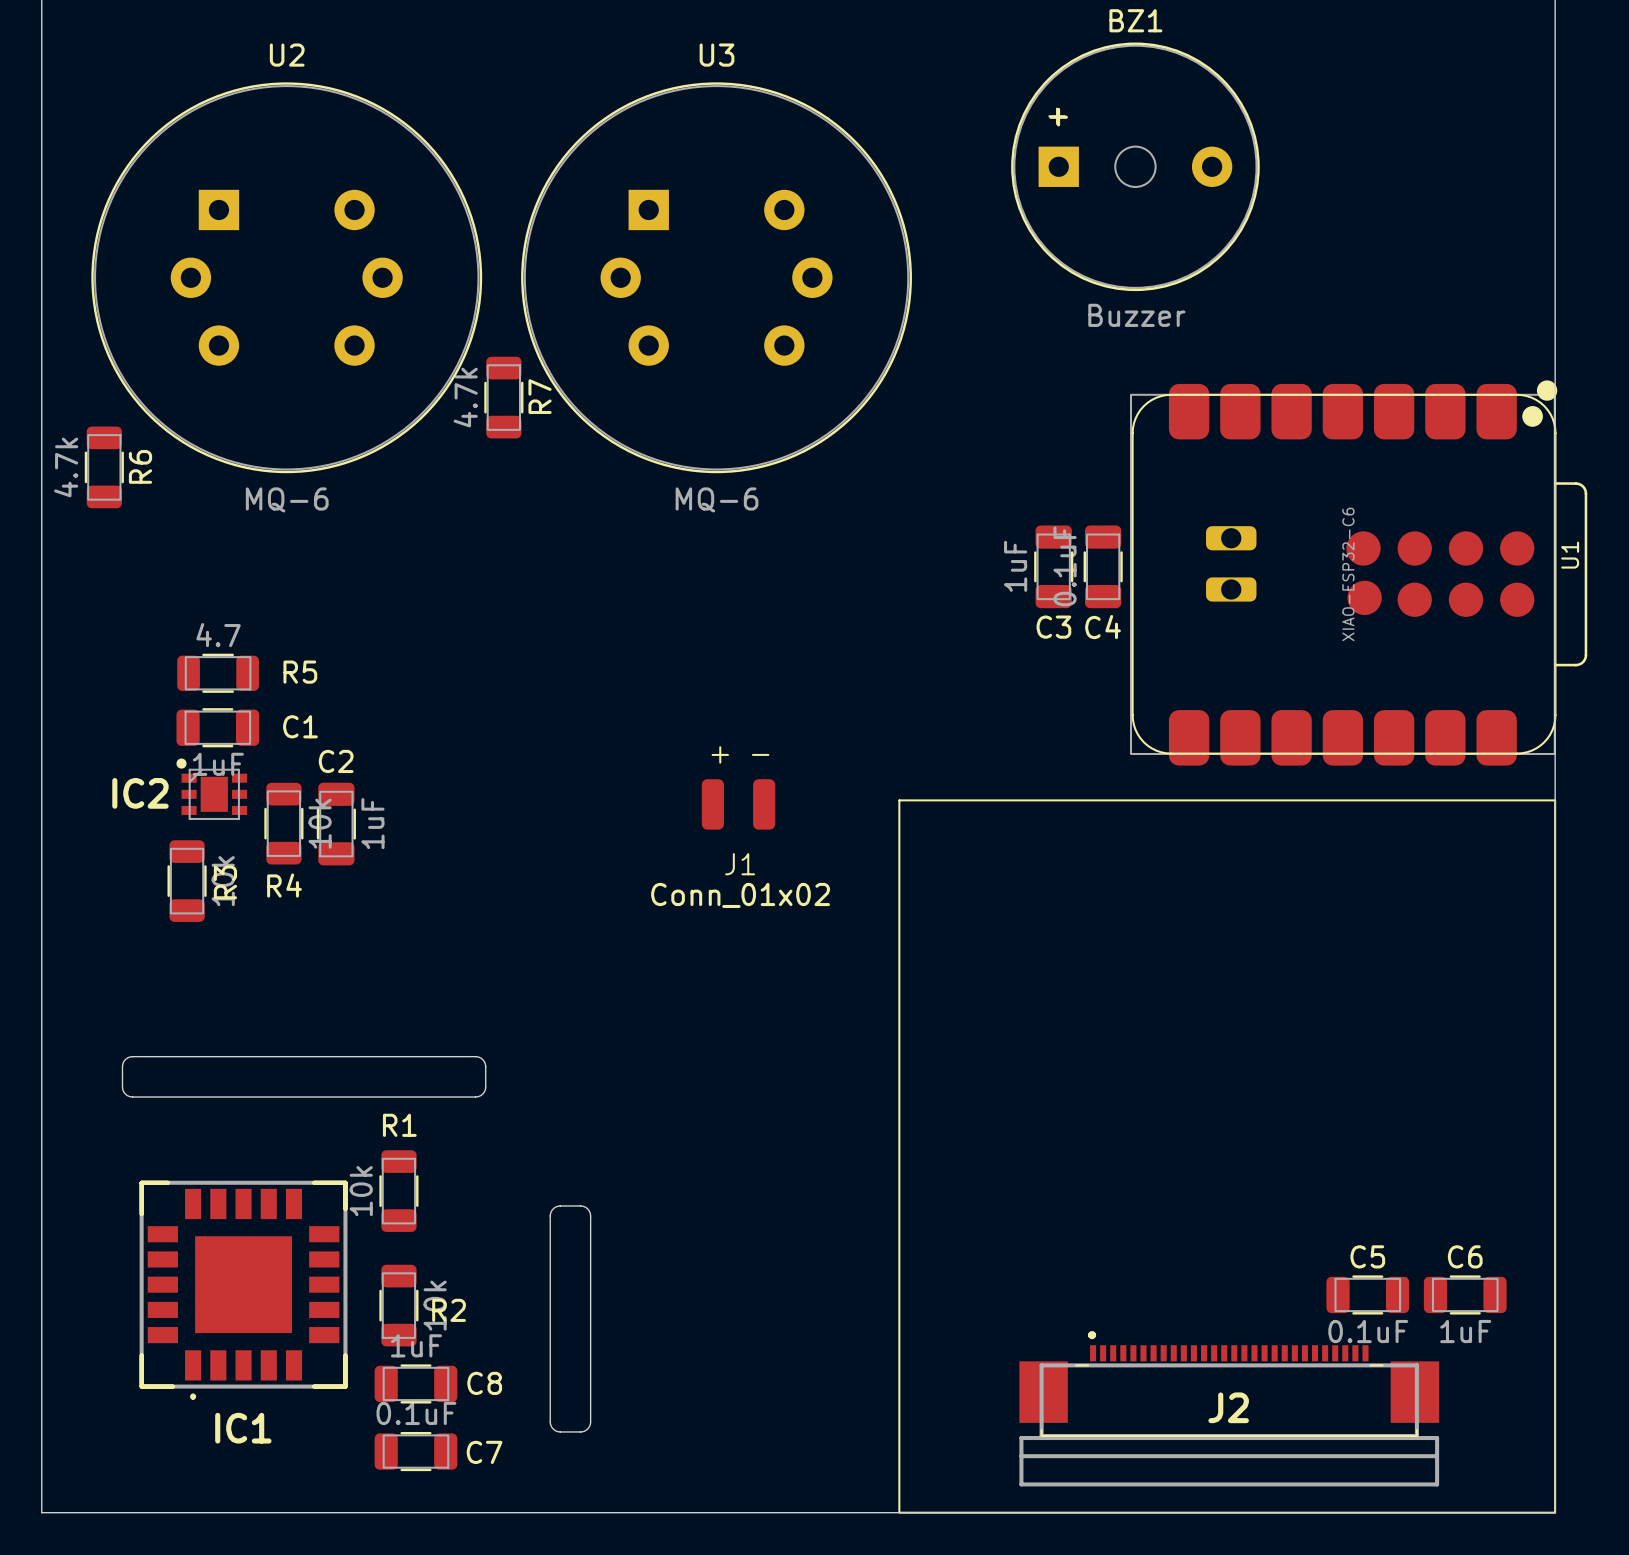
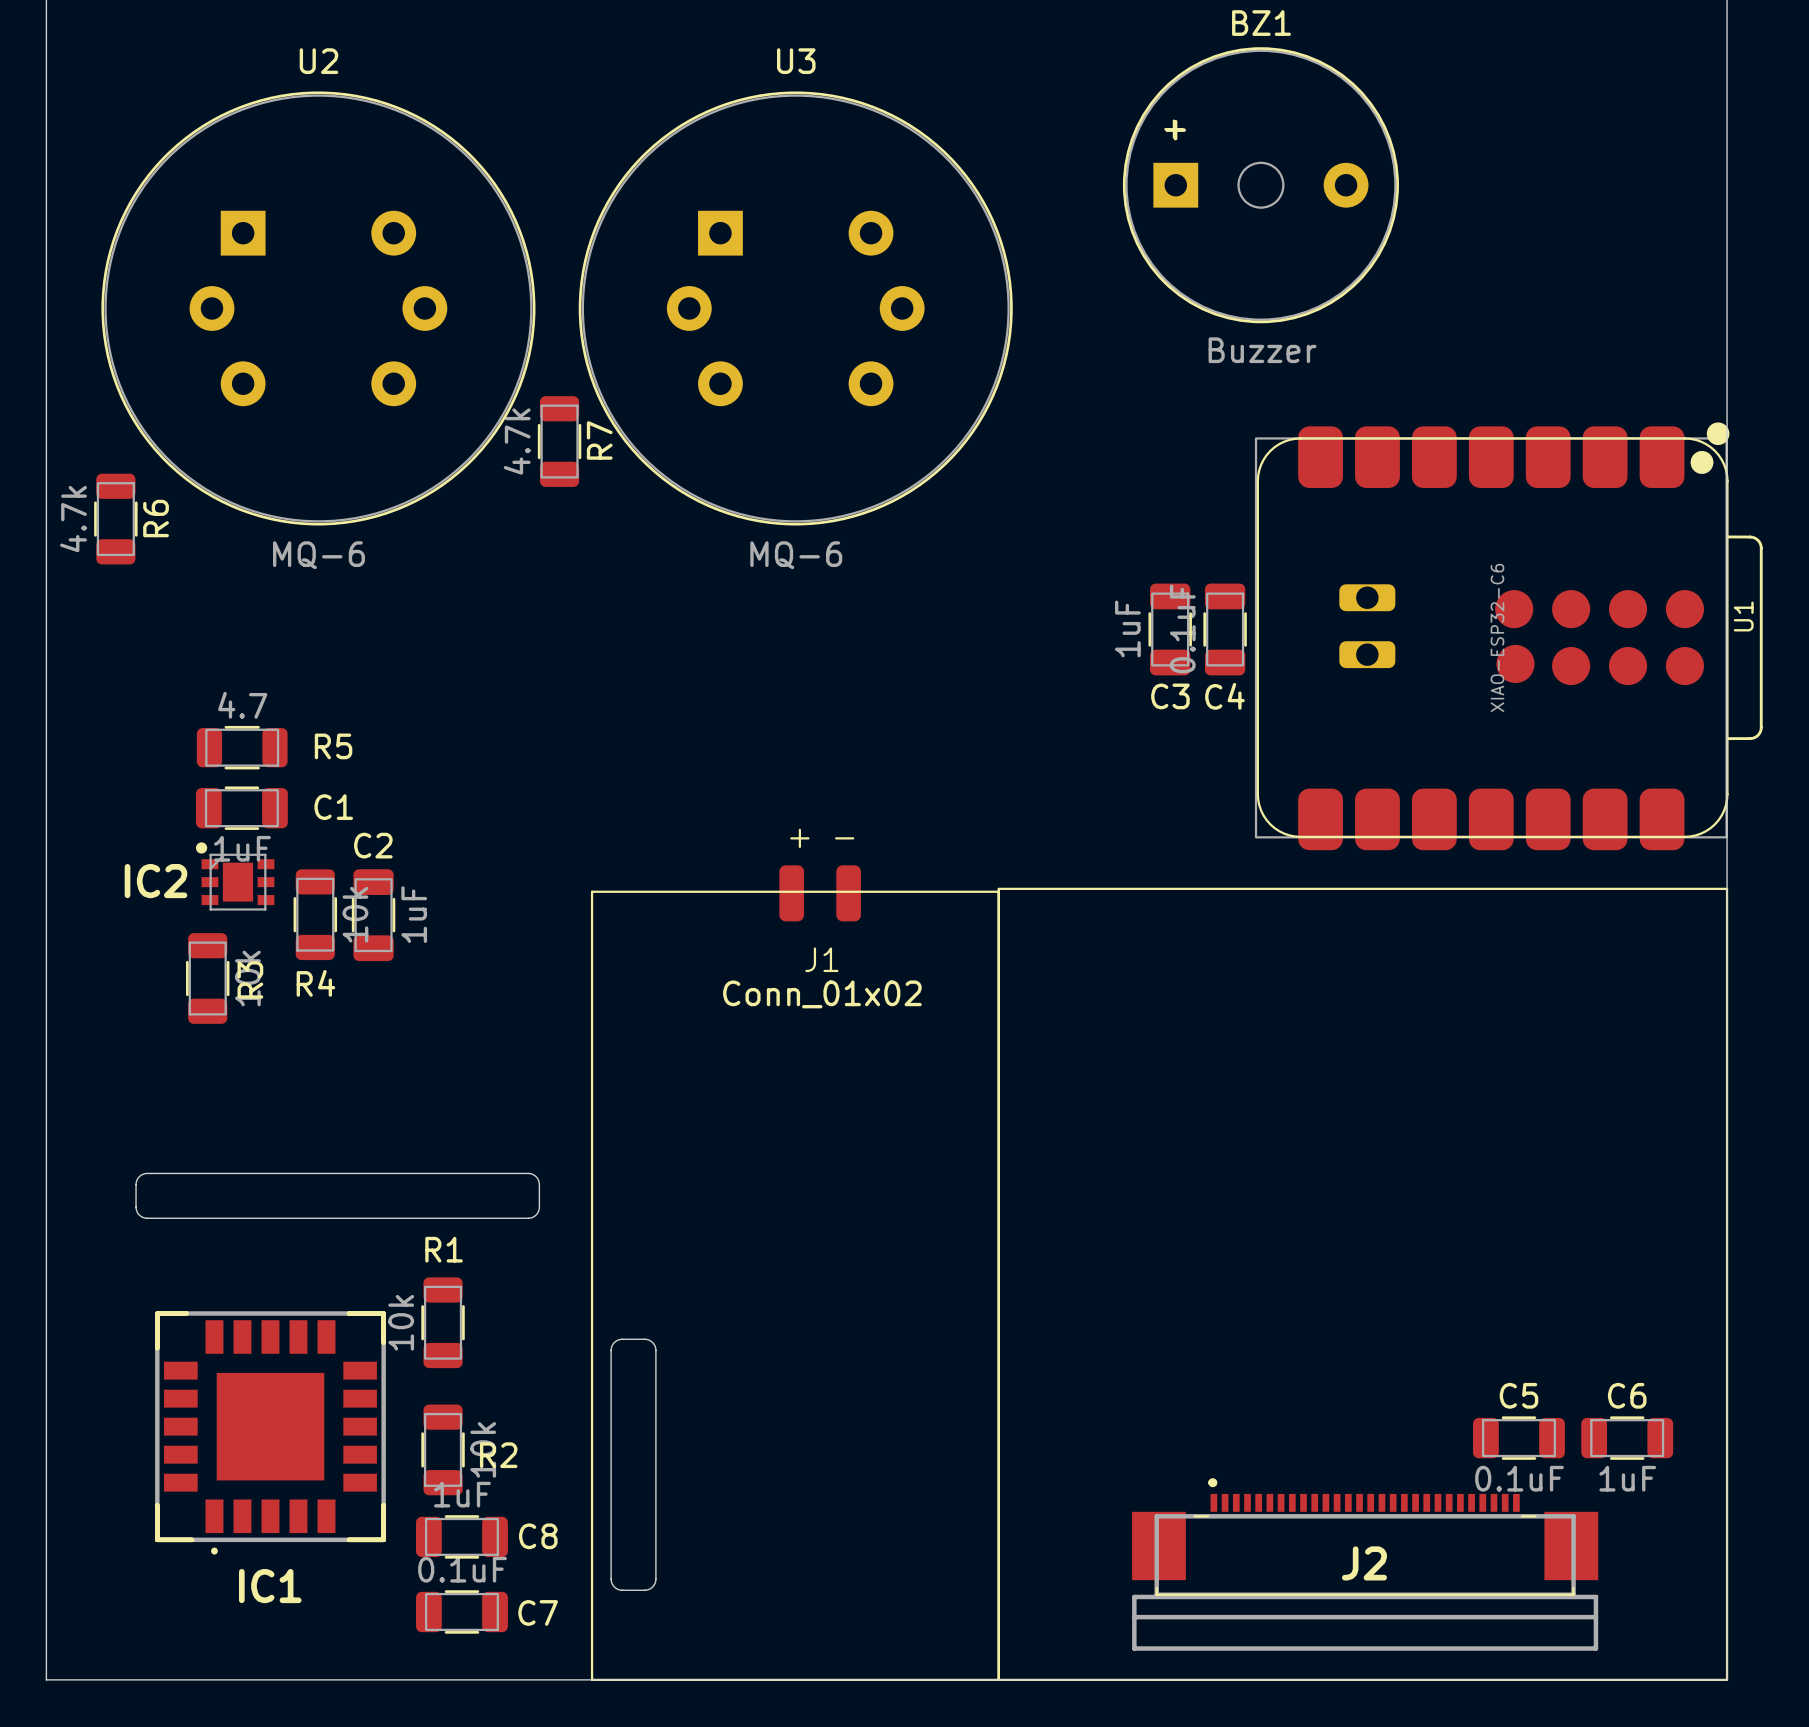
line: none -> (592, 891) (998, 891) (998, 1679) (592, 1679) (592, 891)

